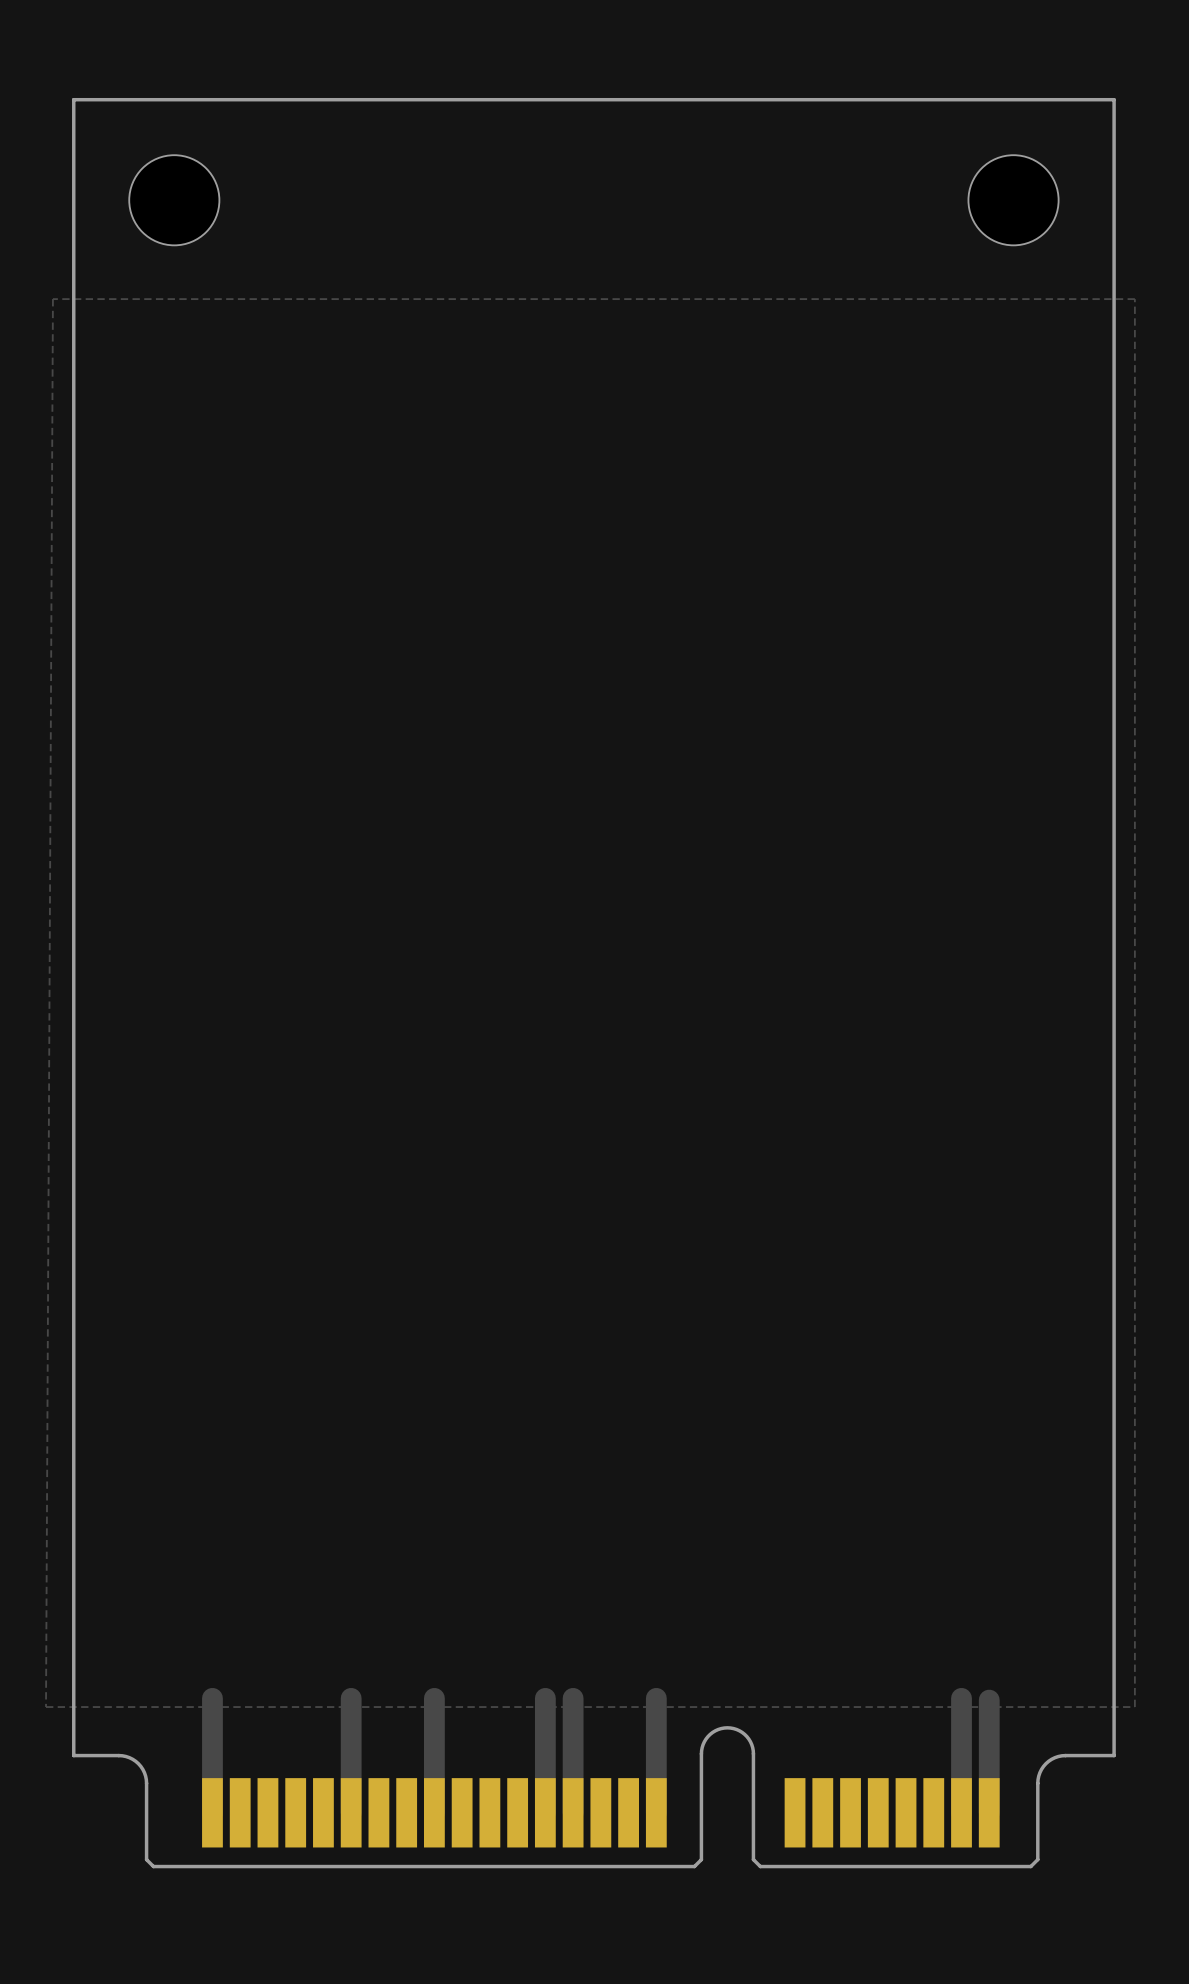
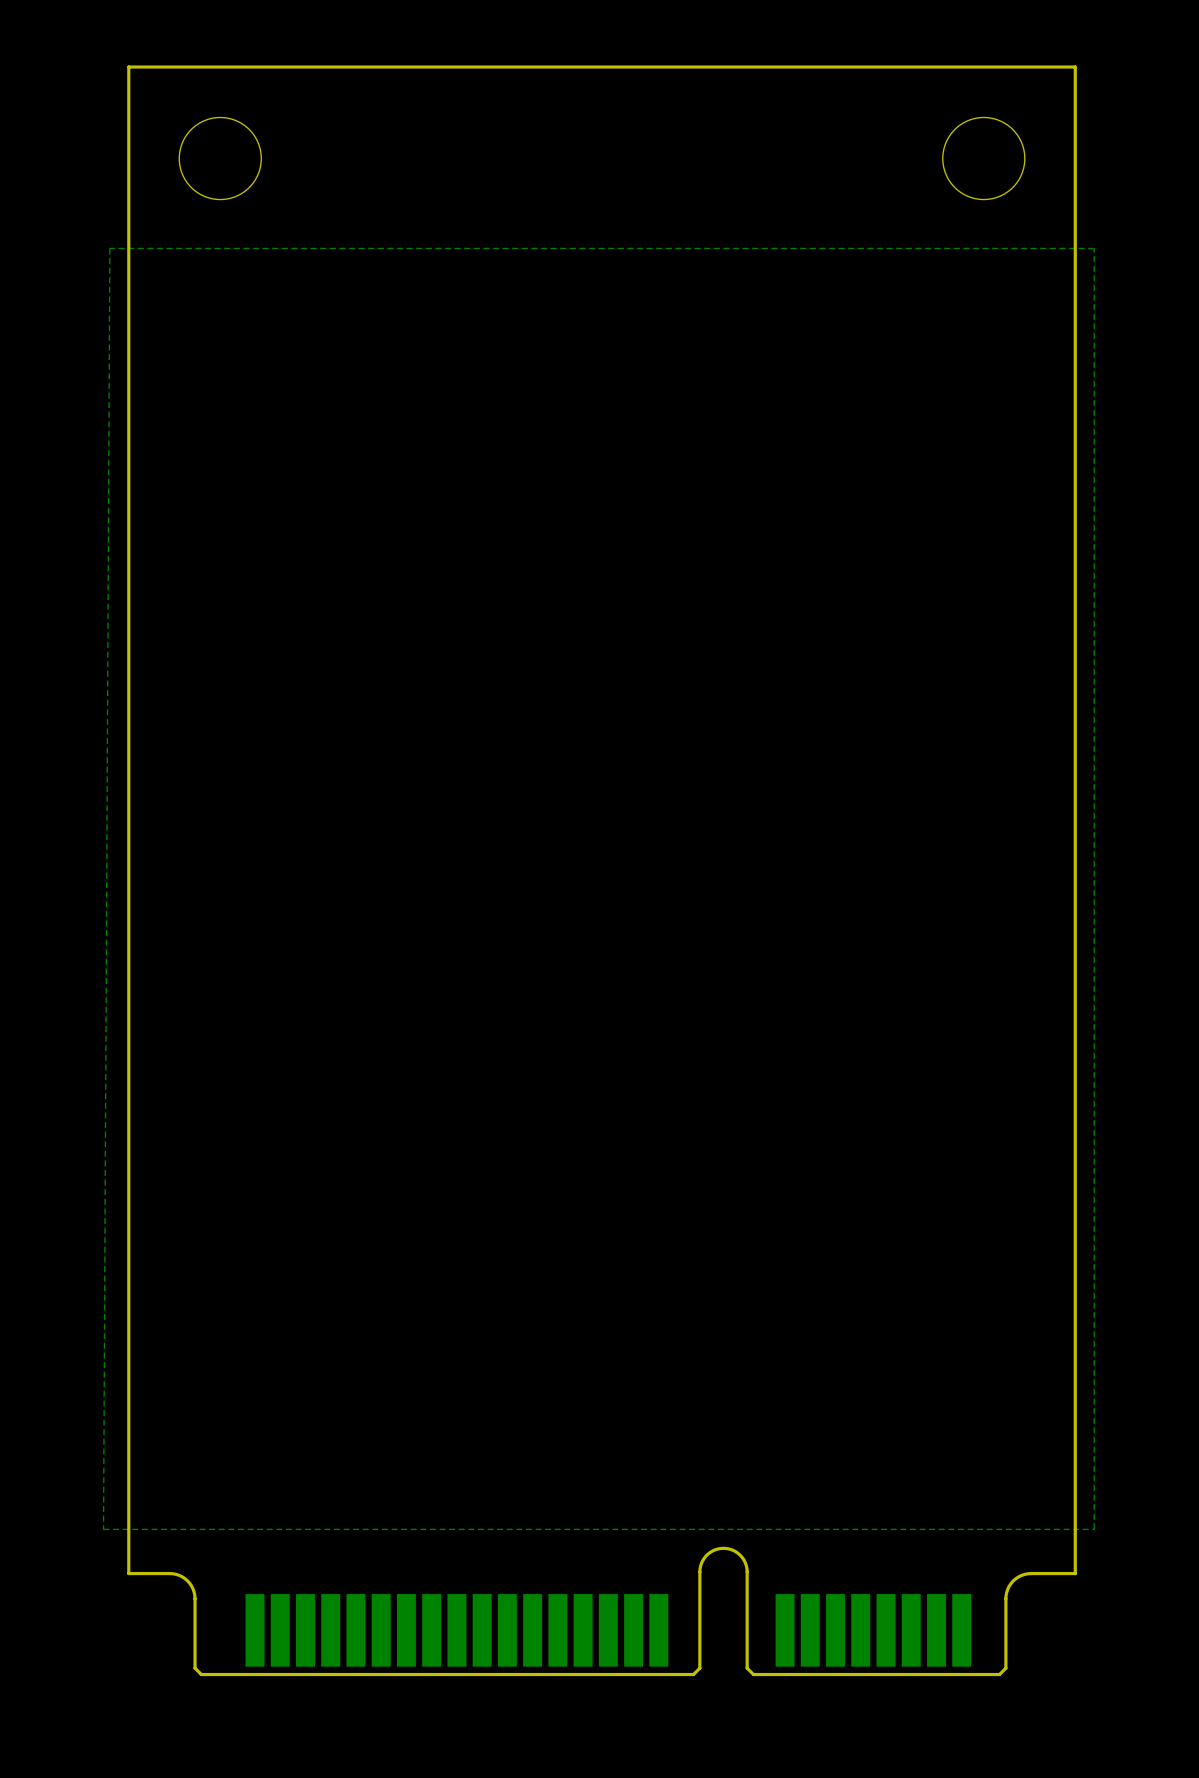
part footprint: [72, 97, 1116, 1869] -> [127, 65, 1077, 1677]
track: (212, 1698) (212, 1812) -> none
track: (351, 1698) (351, 1812) -> none
track: (434, 1698) (434, 1812) -> none
track: (545, 1698) (545, 1812) -> none
track: (573, 1698) (573, 1812) -> none
track: (656, 1698) (656, 1812) -> none
track: (961, 1698) (961, 1812) -> none
track: (989, 1700) (989, 1812) -> none

